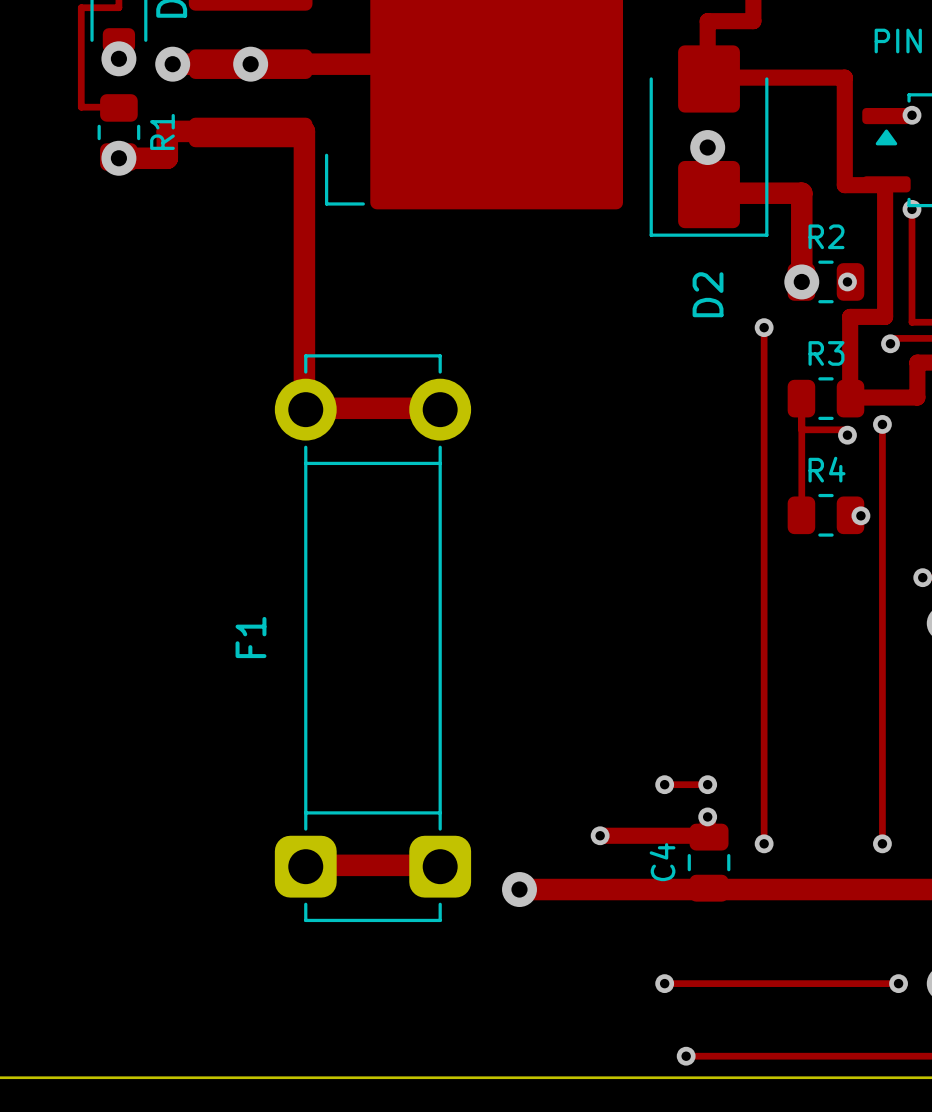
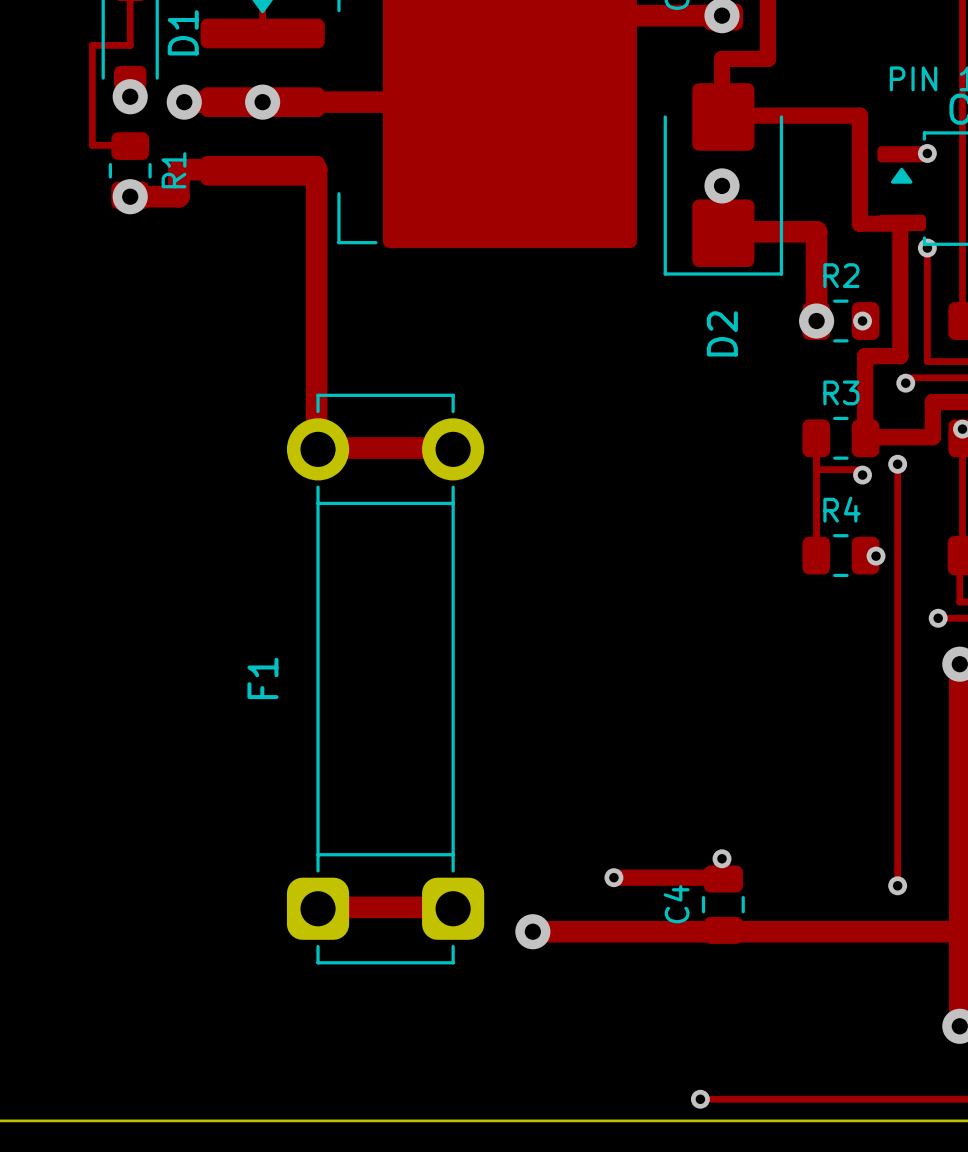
track: (764, 327) (764, 843) -> none
via: (764, 327) -> none
track: (664, 784) (707, 784) -> none
via: (664, 784) -> none
via: (707, 784) -> none
via: (764, 843) -> none
track: (664, 983) (898, 983) -> none
via: (664, 983) -> none
via: (898, 983) -> none

